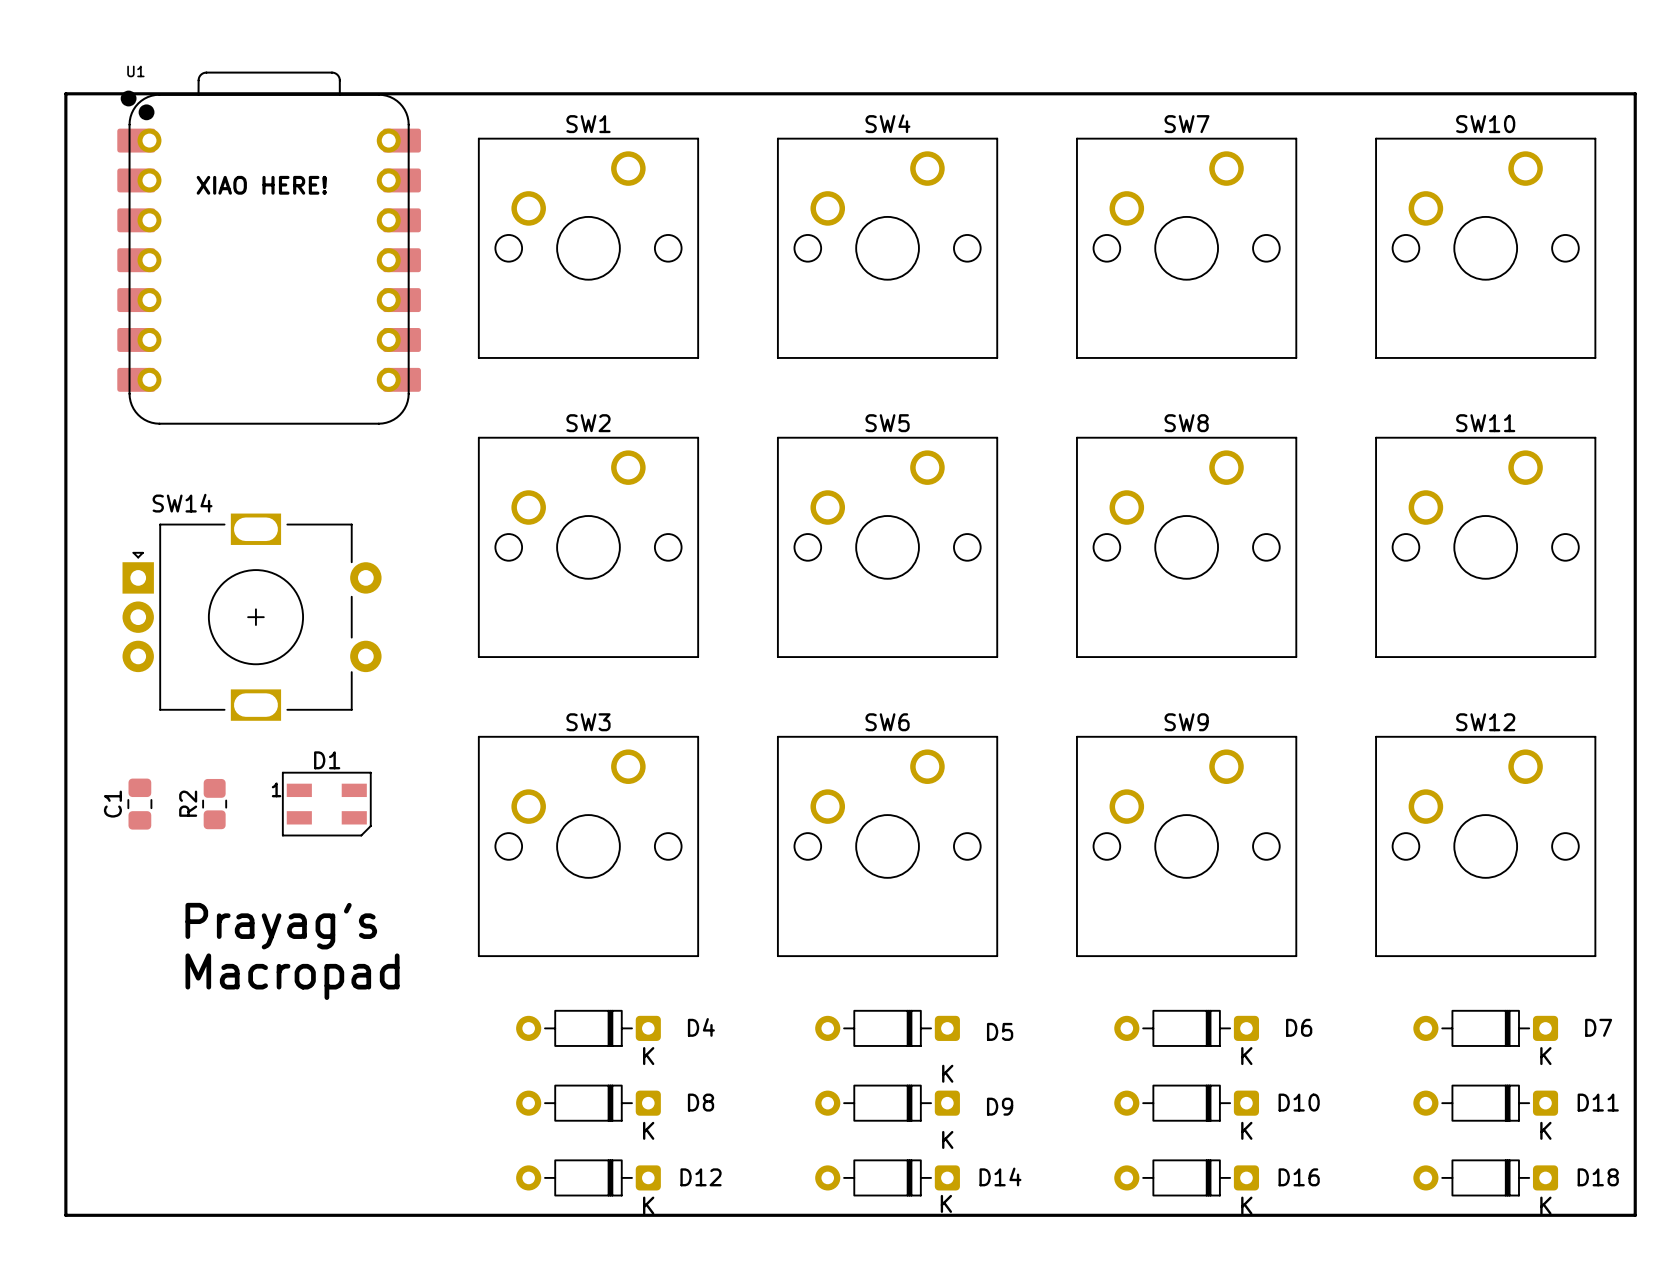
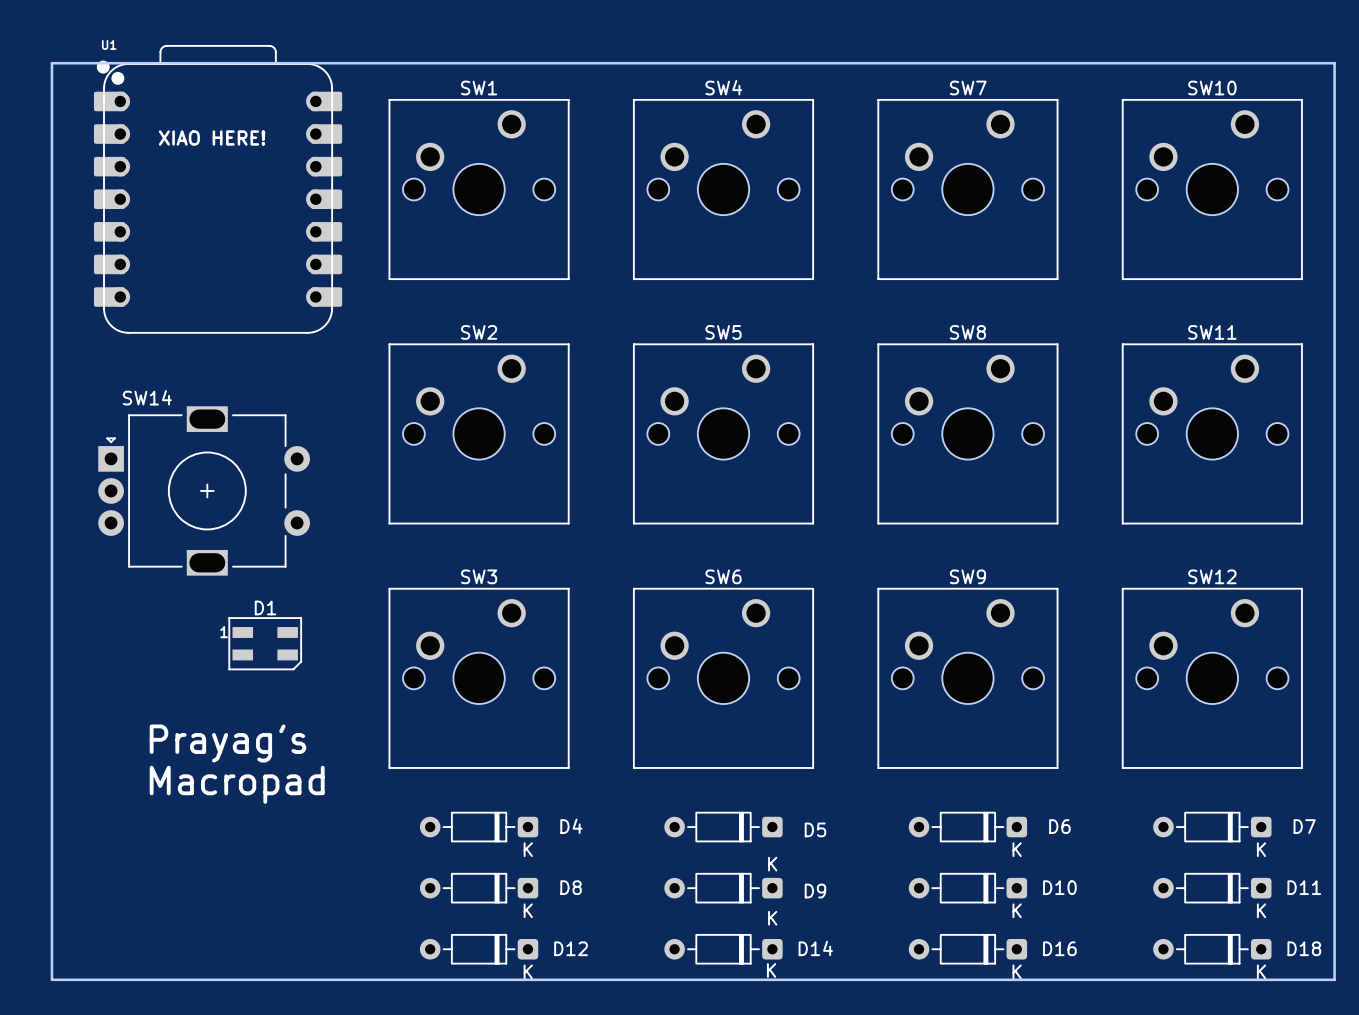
C1: (139, 804) -> none
R2: (214, 804) -> none

